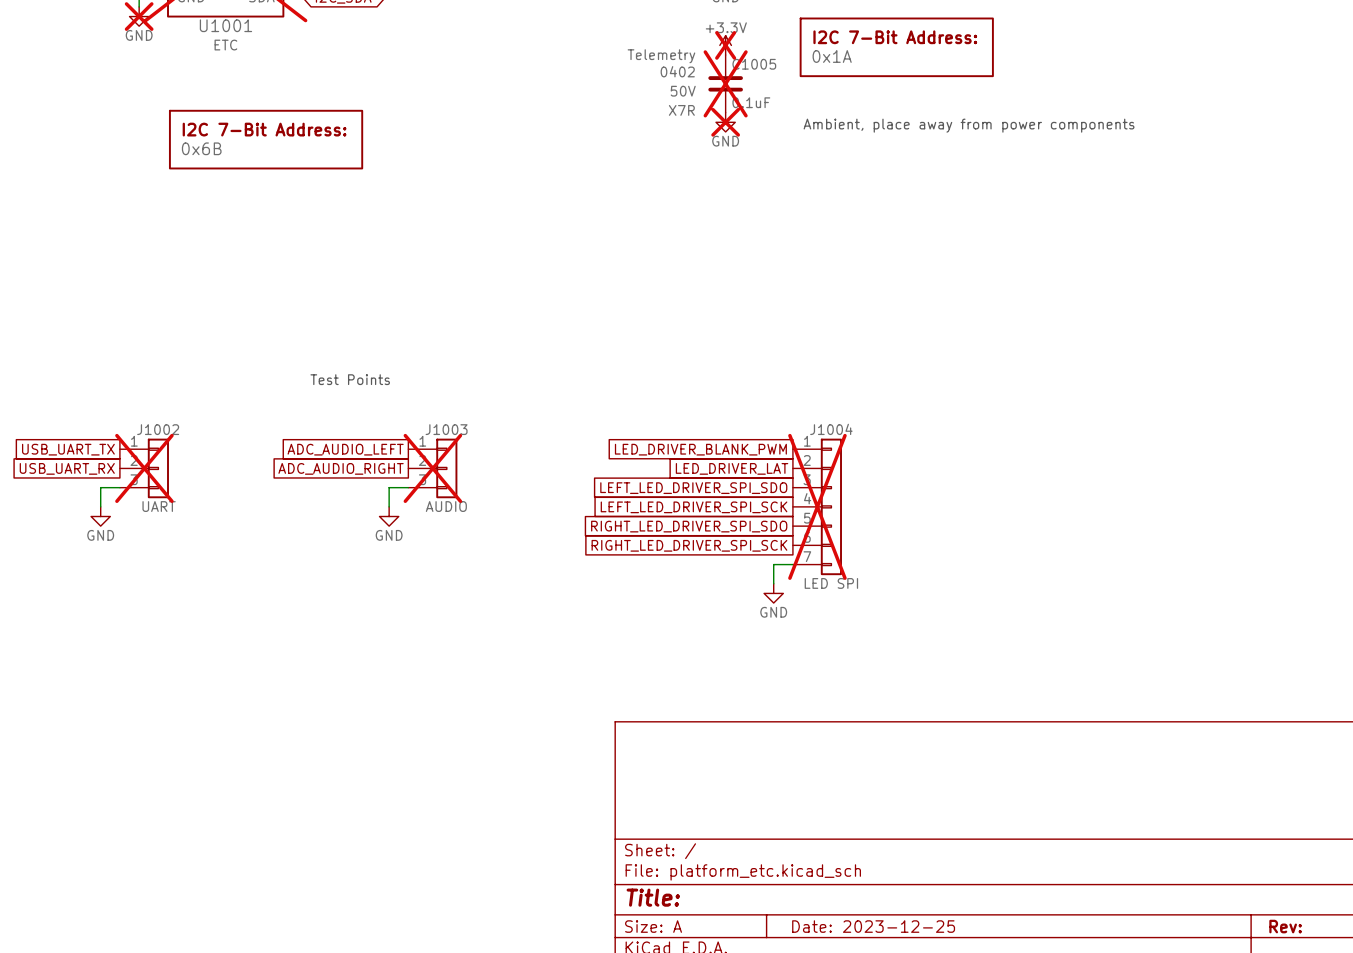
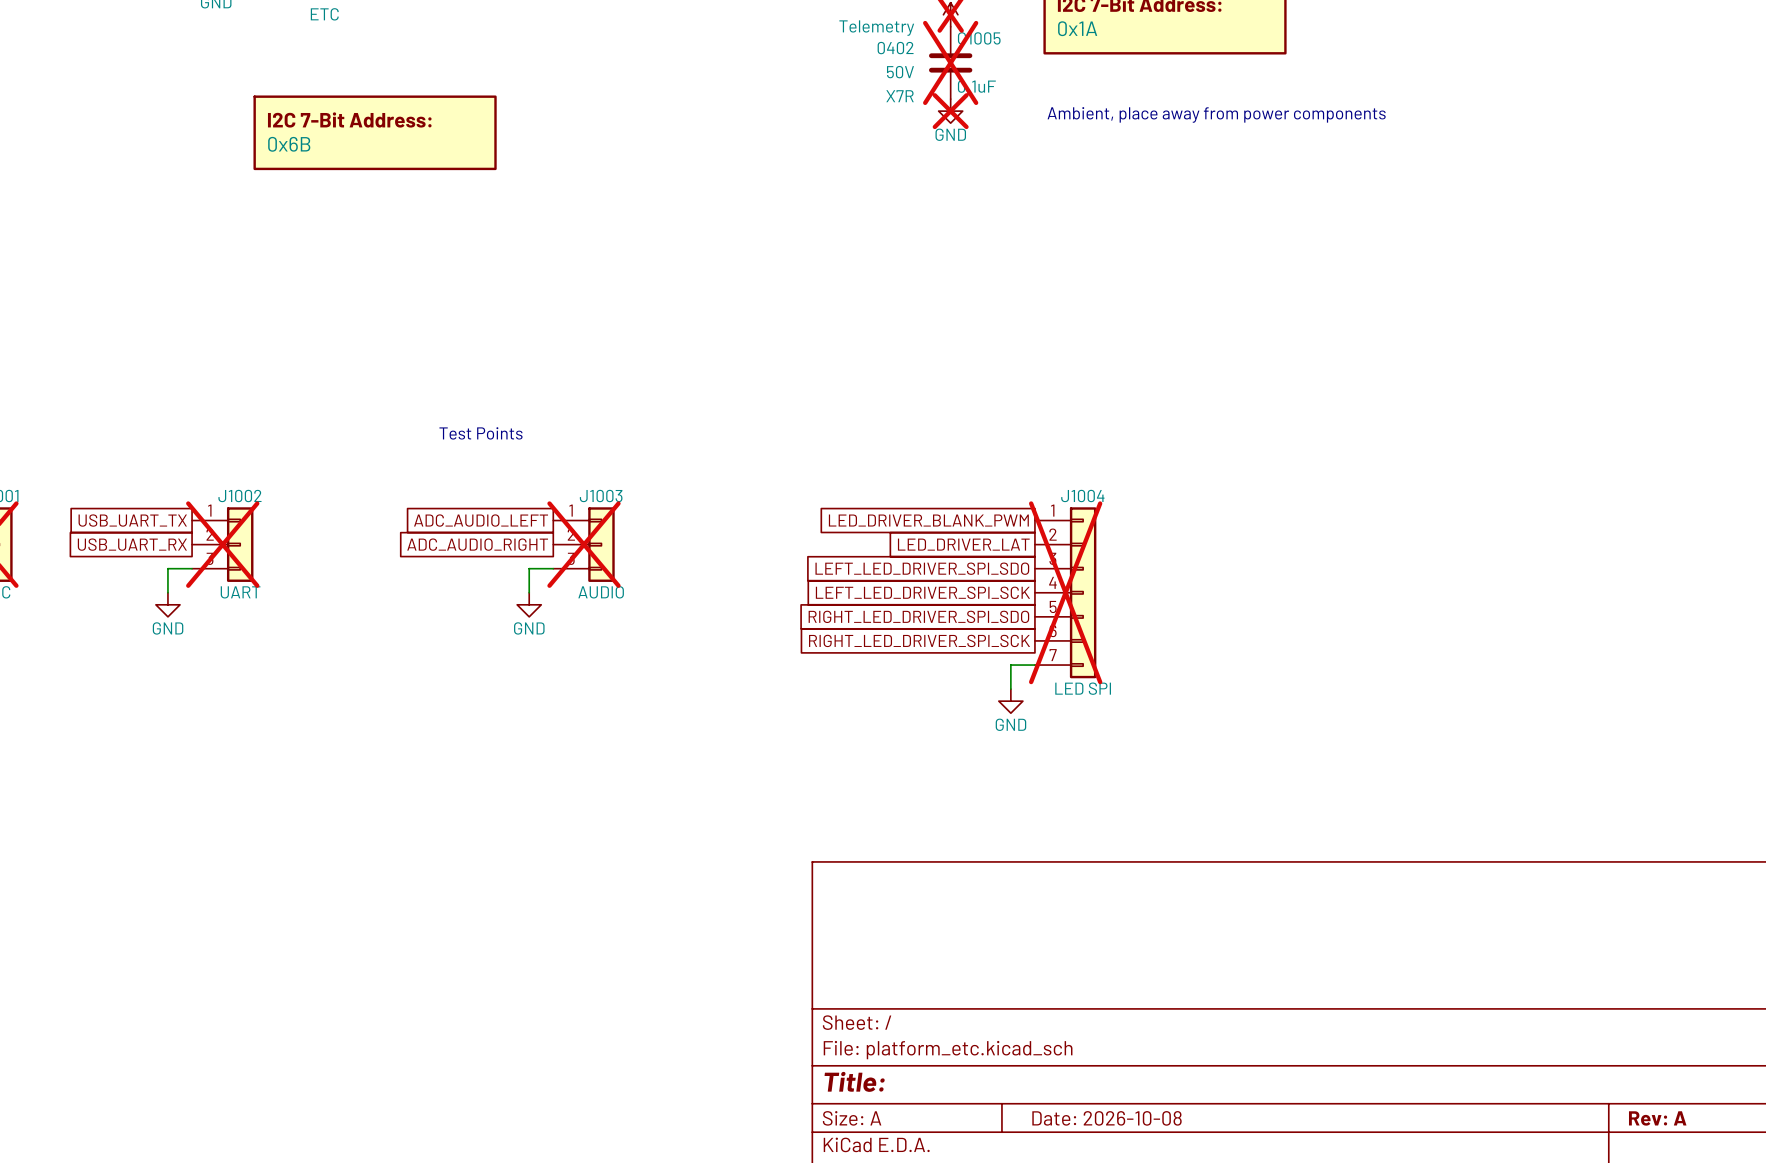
title block: Date: 2023-12-25 (873, 926) -> Date: 2026-10-08 (1106, 1118)
title block: Rev: (1285, 926) -> Rev: A (1657, 1118)

